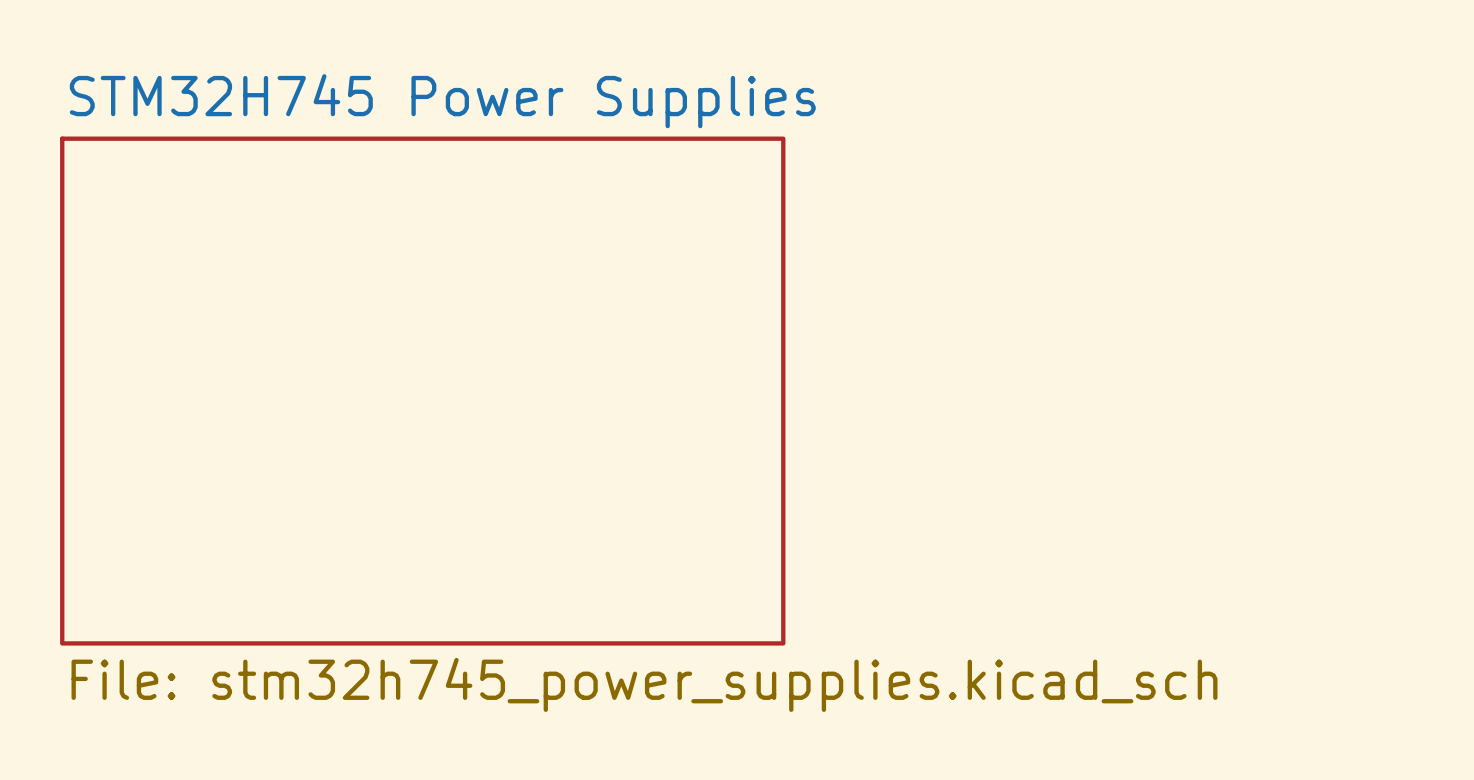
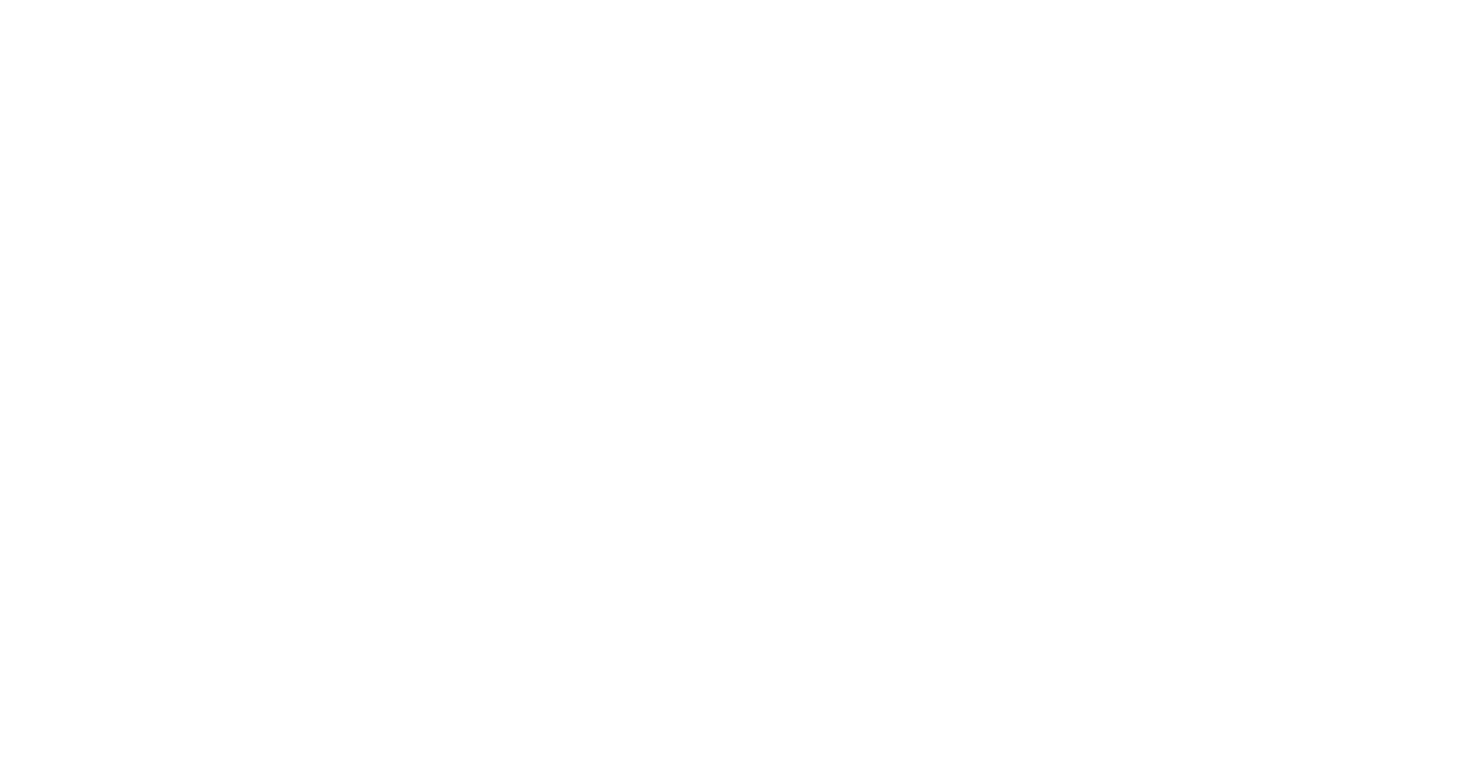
sheet STM32H745 Power Supplies: File: stm32h745_power_supplies.kicad_sch (422, 391) -> none

